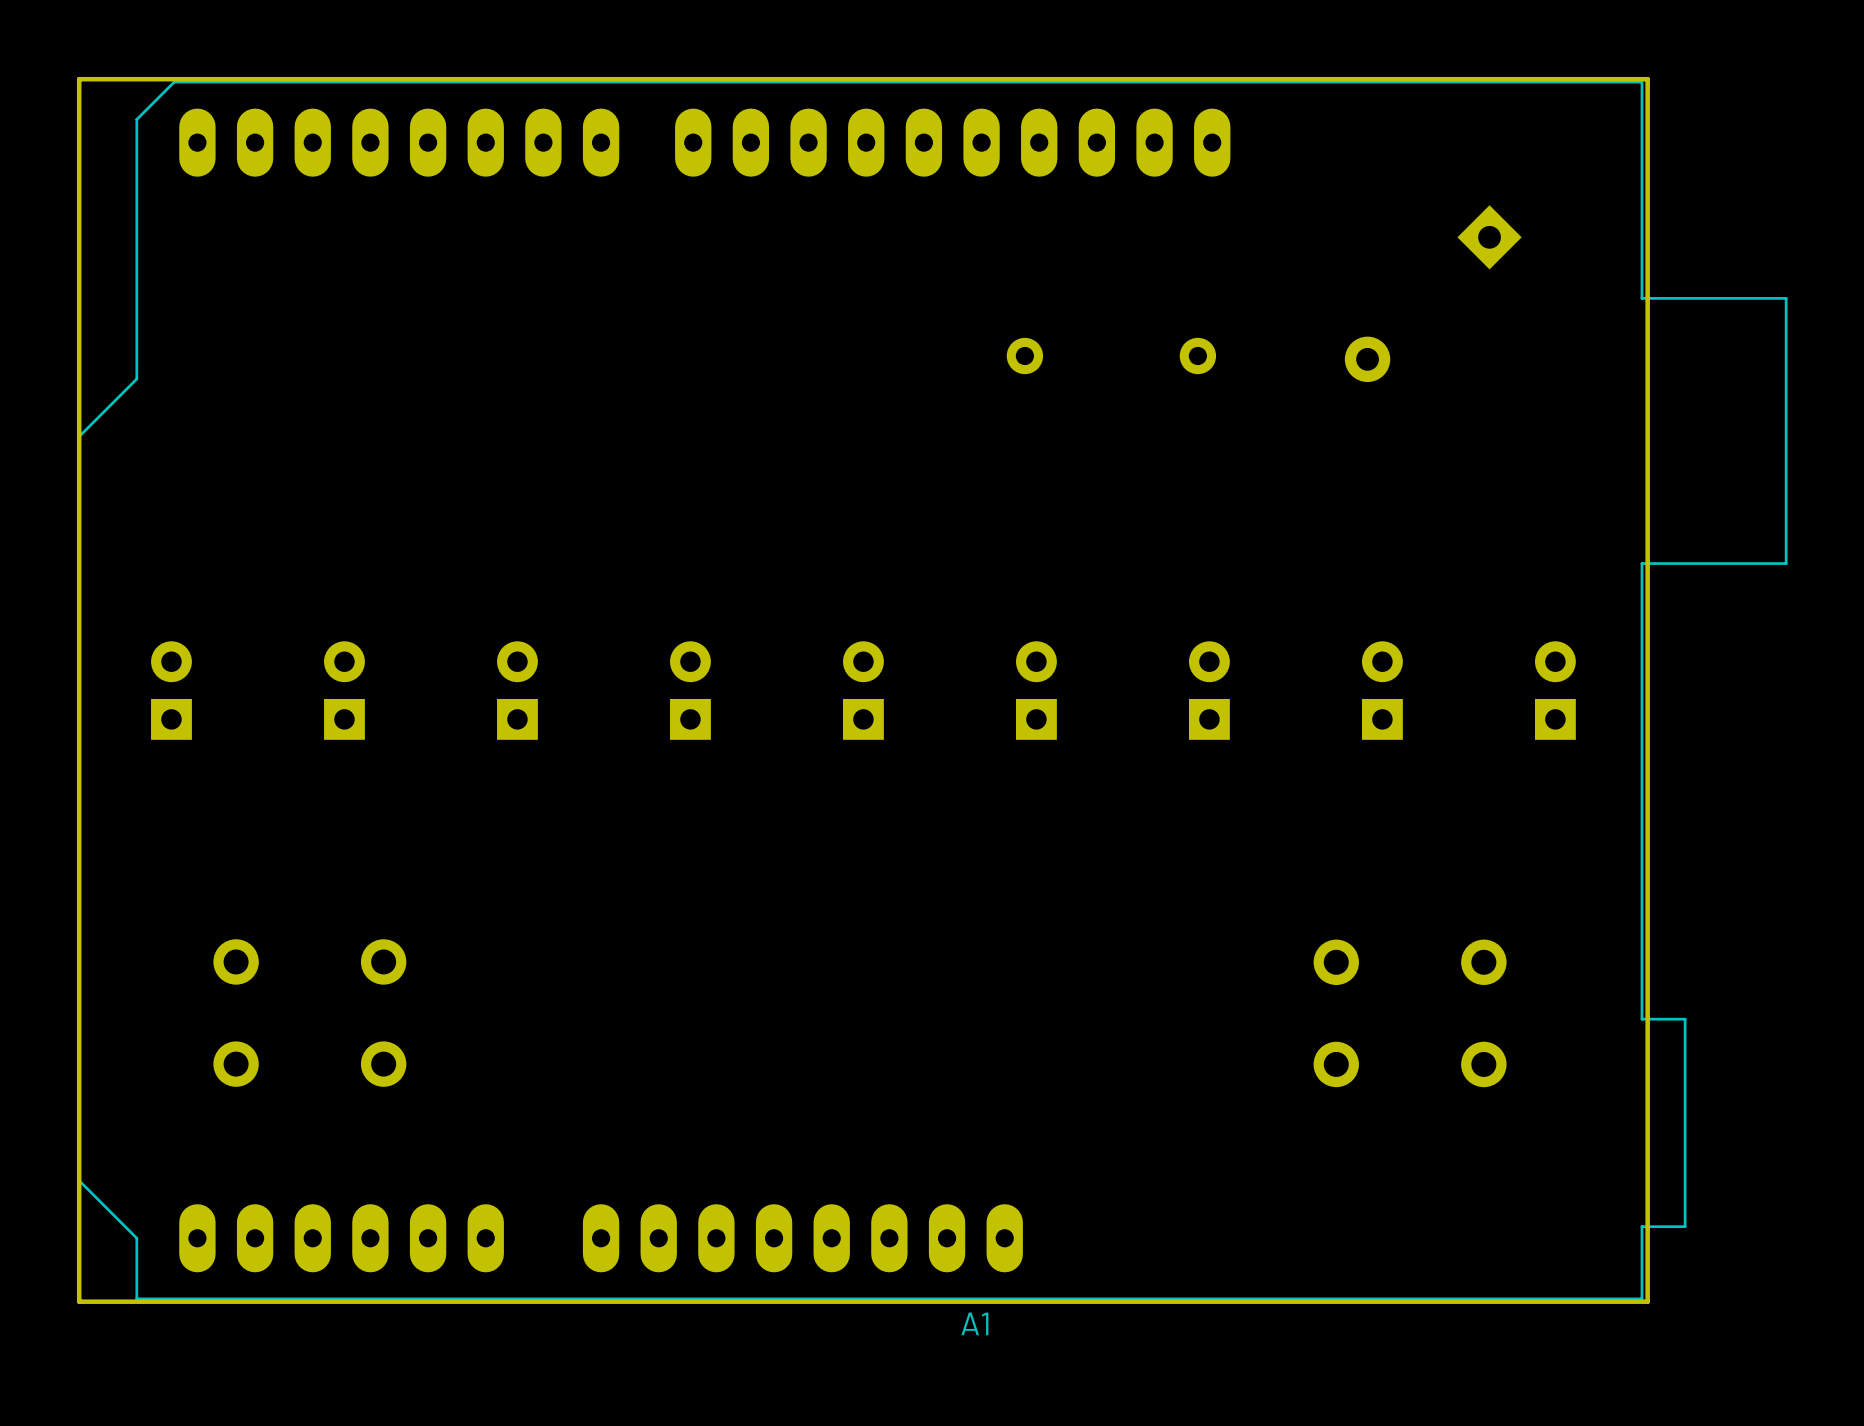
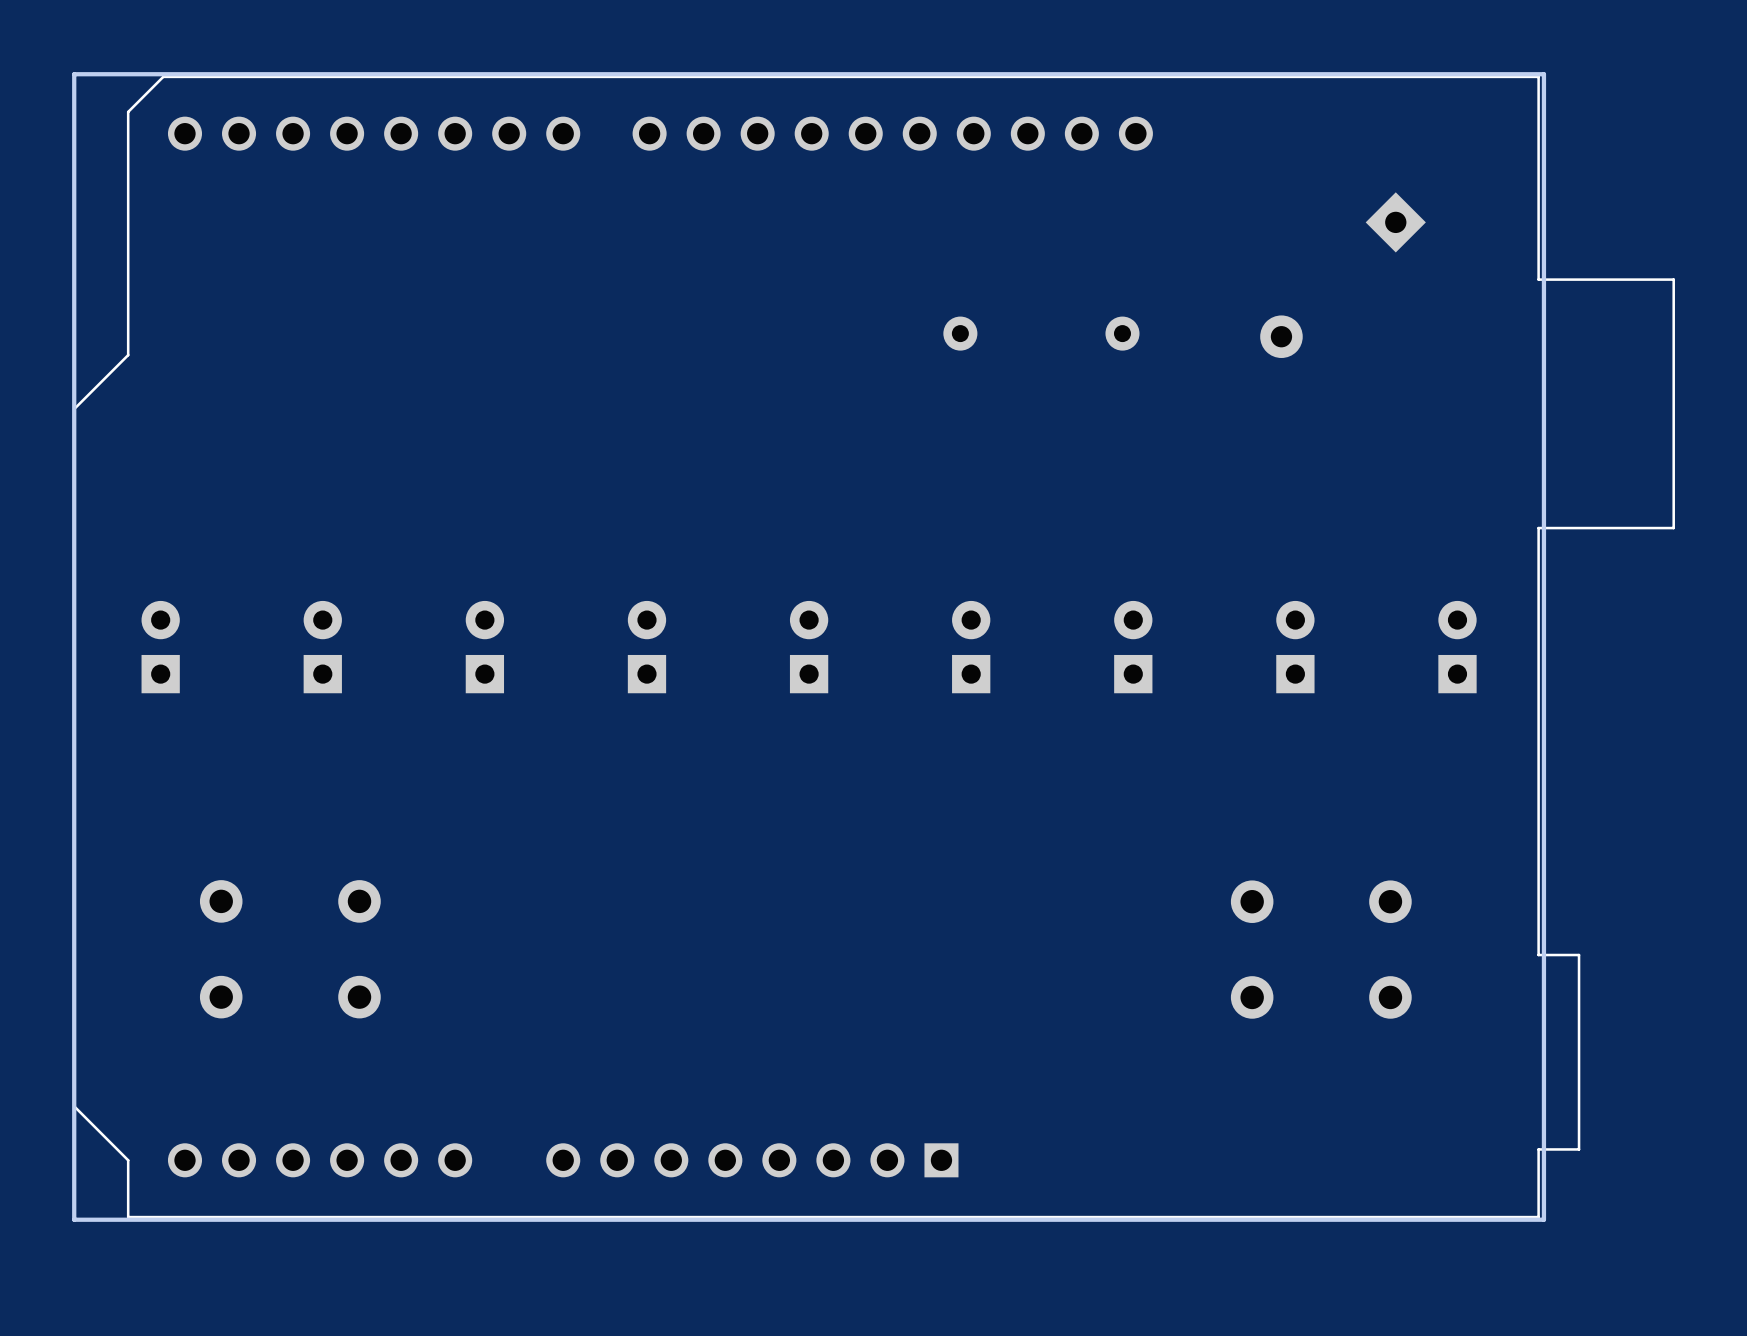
A1: (932, 690) -> none
part: none -> (873, 646)

